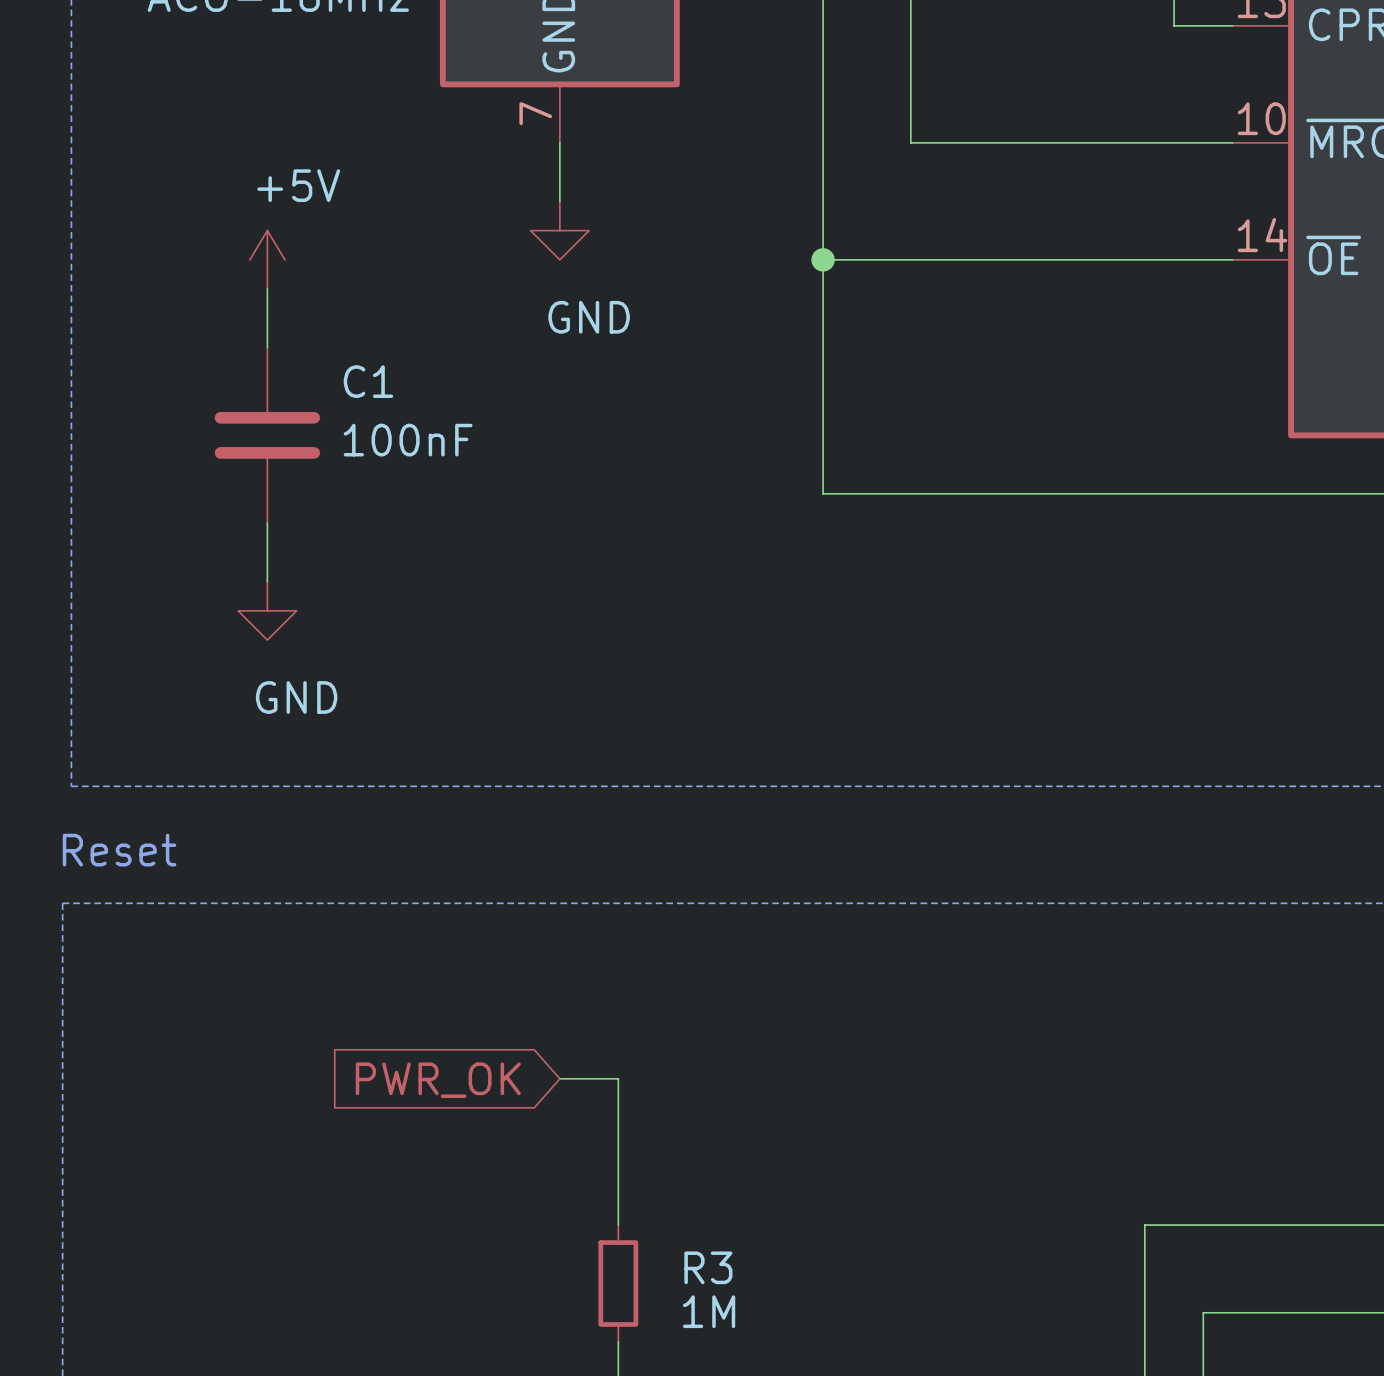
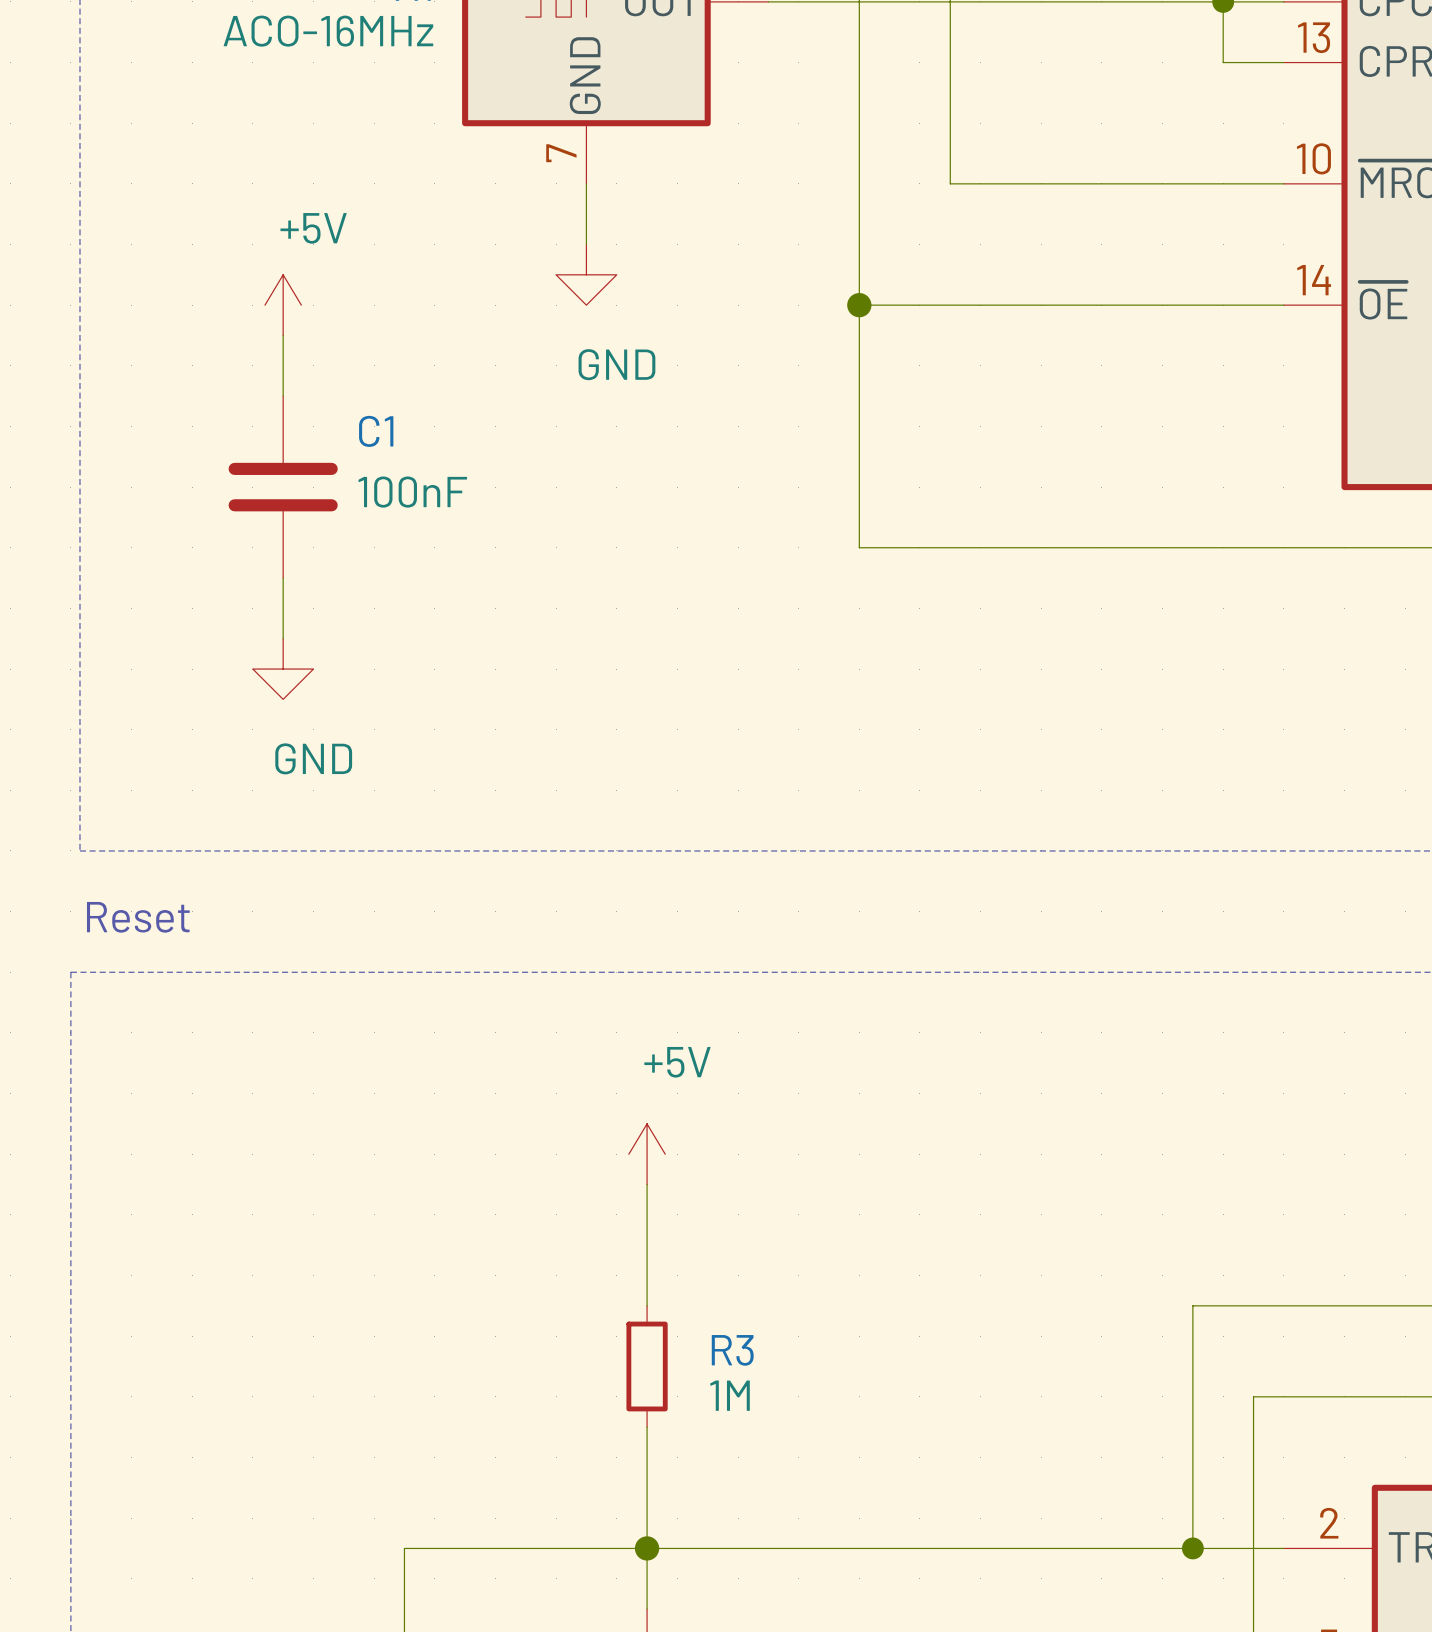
wire: (559, 1078) (618, 1078) (618, 1108) -> none
power symbol: none -> +5V (647, 1154)
global label: PWR_OK (438, 1080) -> none

